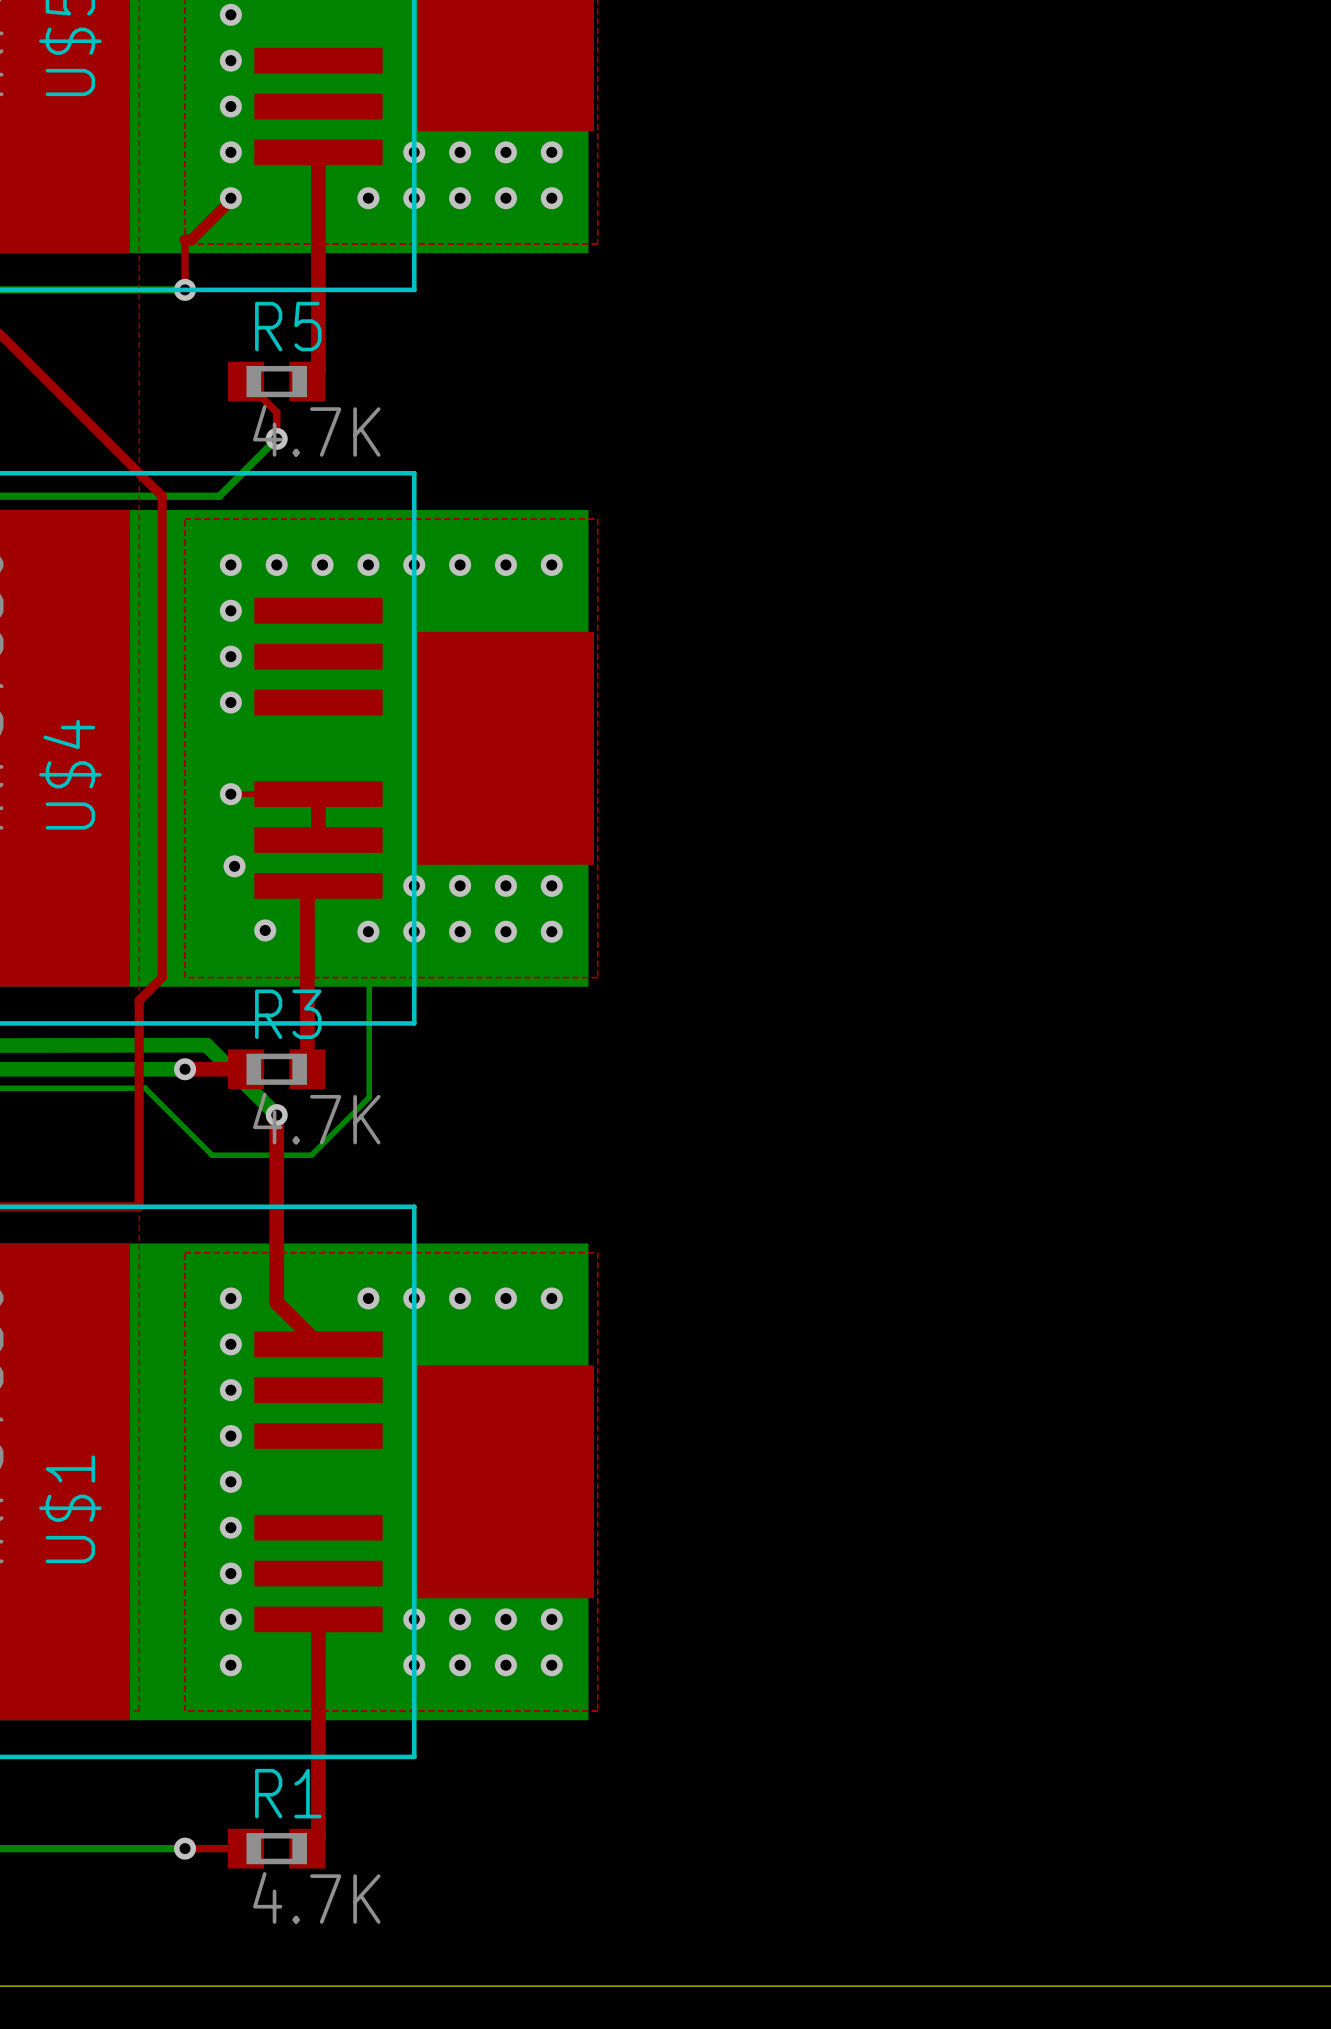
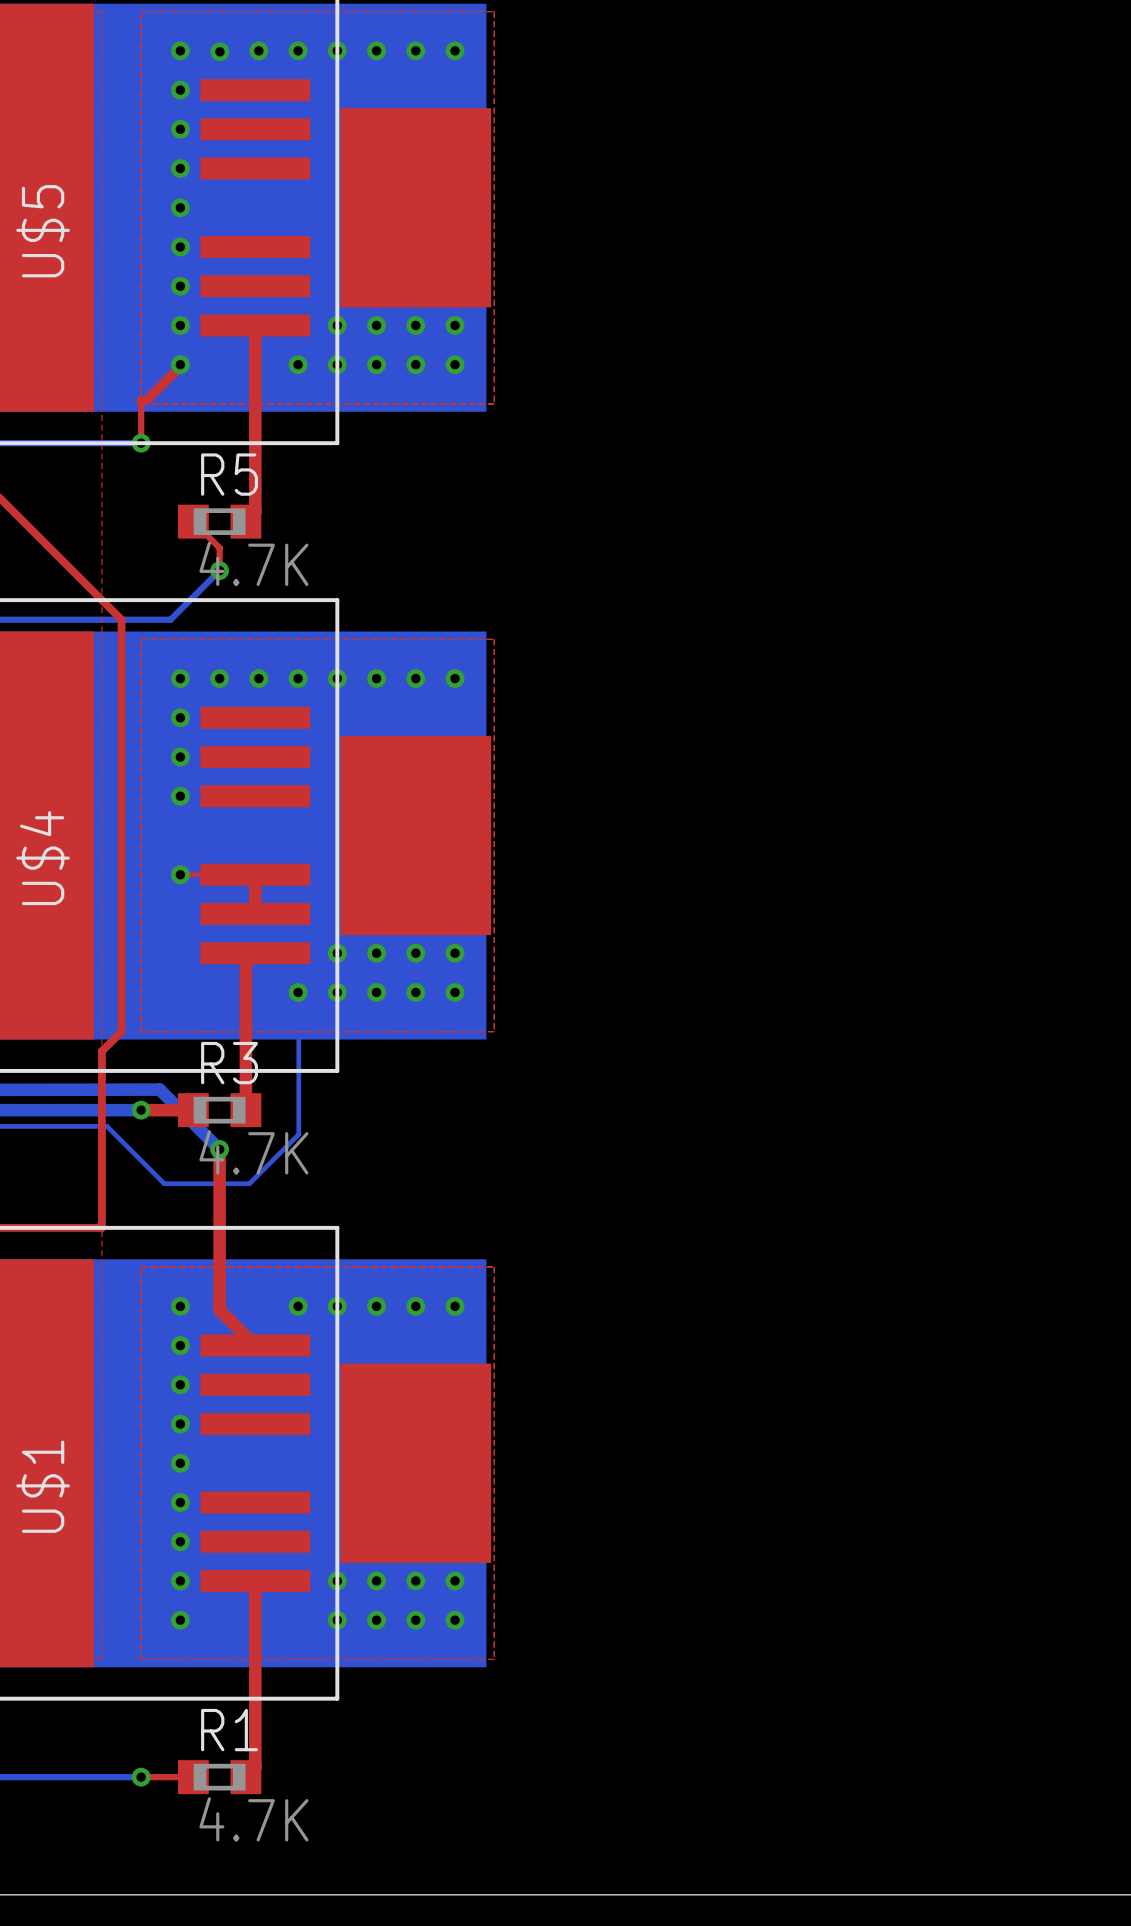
via: (234, 866) -> none
via: (265, 930) -> none

